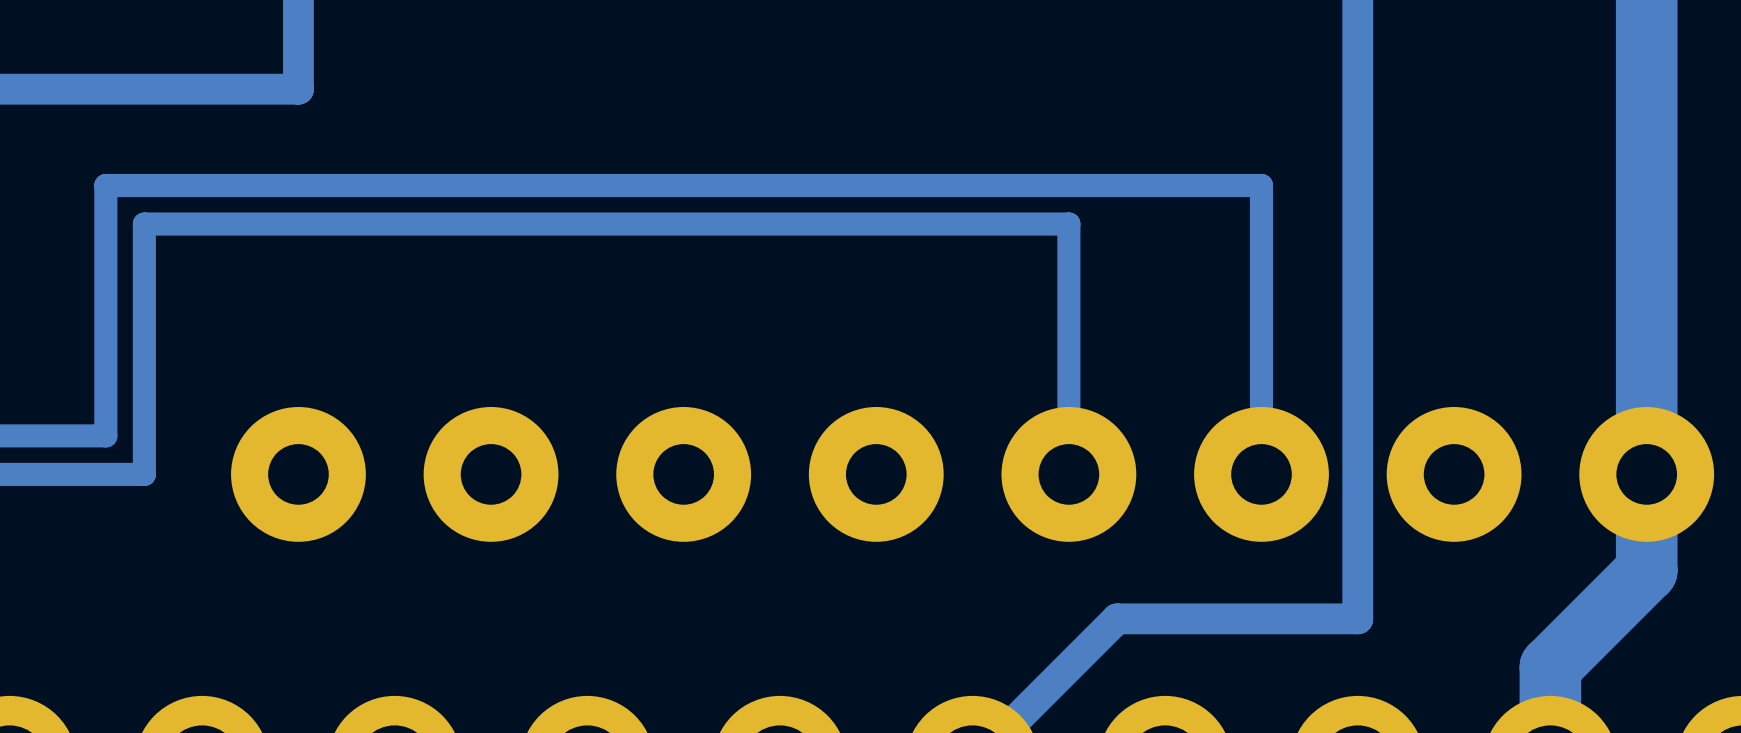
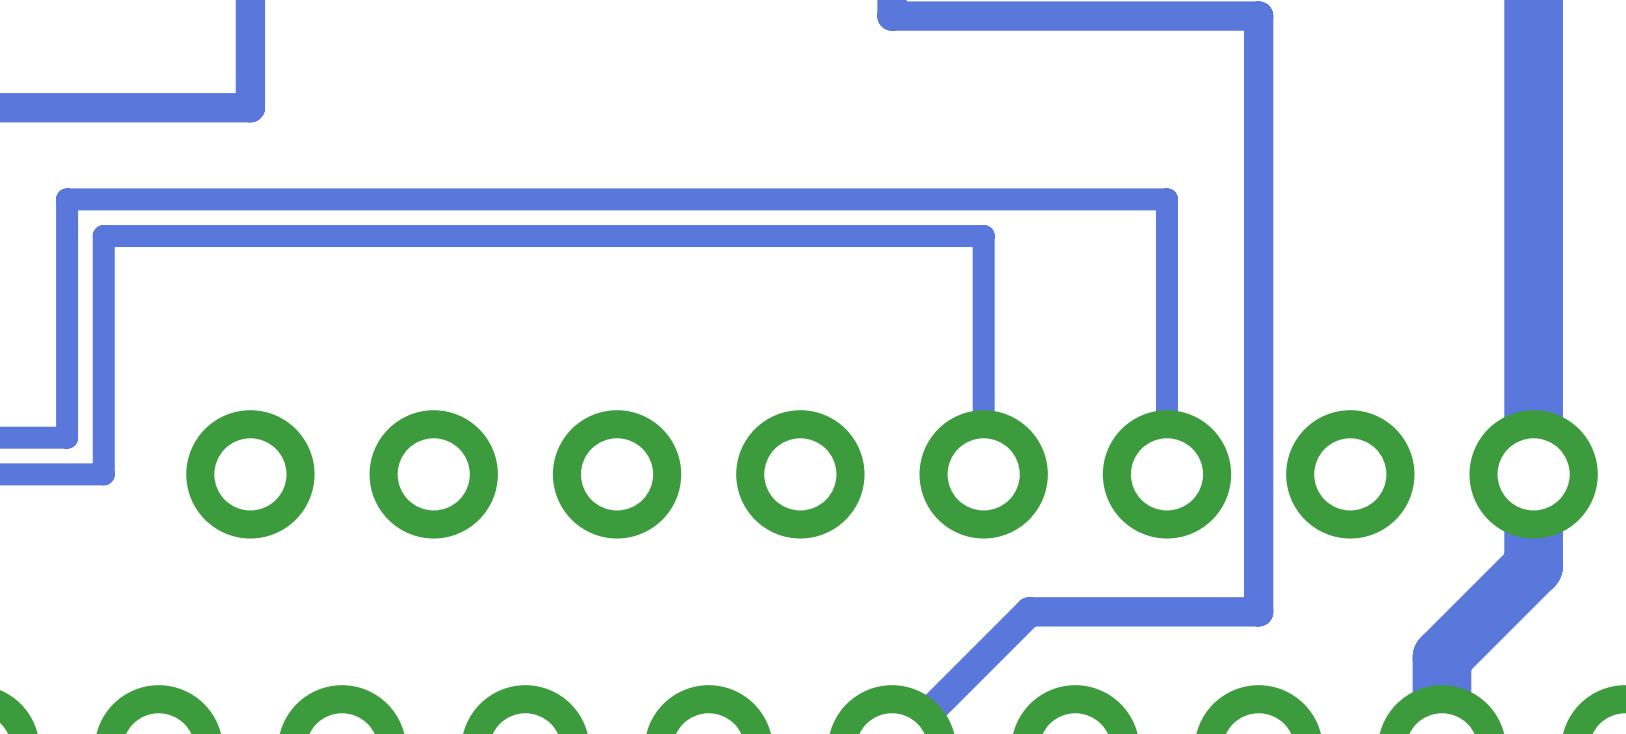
part footprint: [231, 406, 1715, 542] -> [186, 410, 1598, 539]

